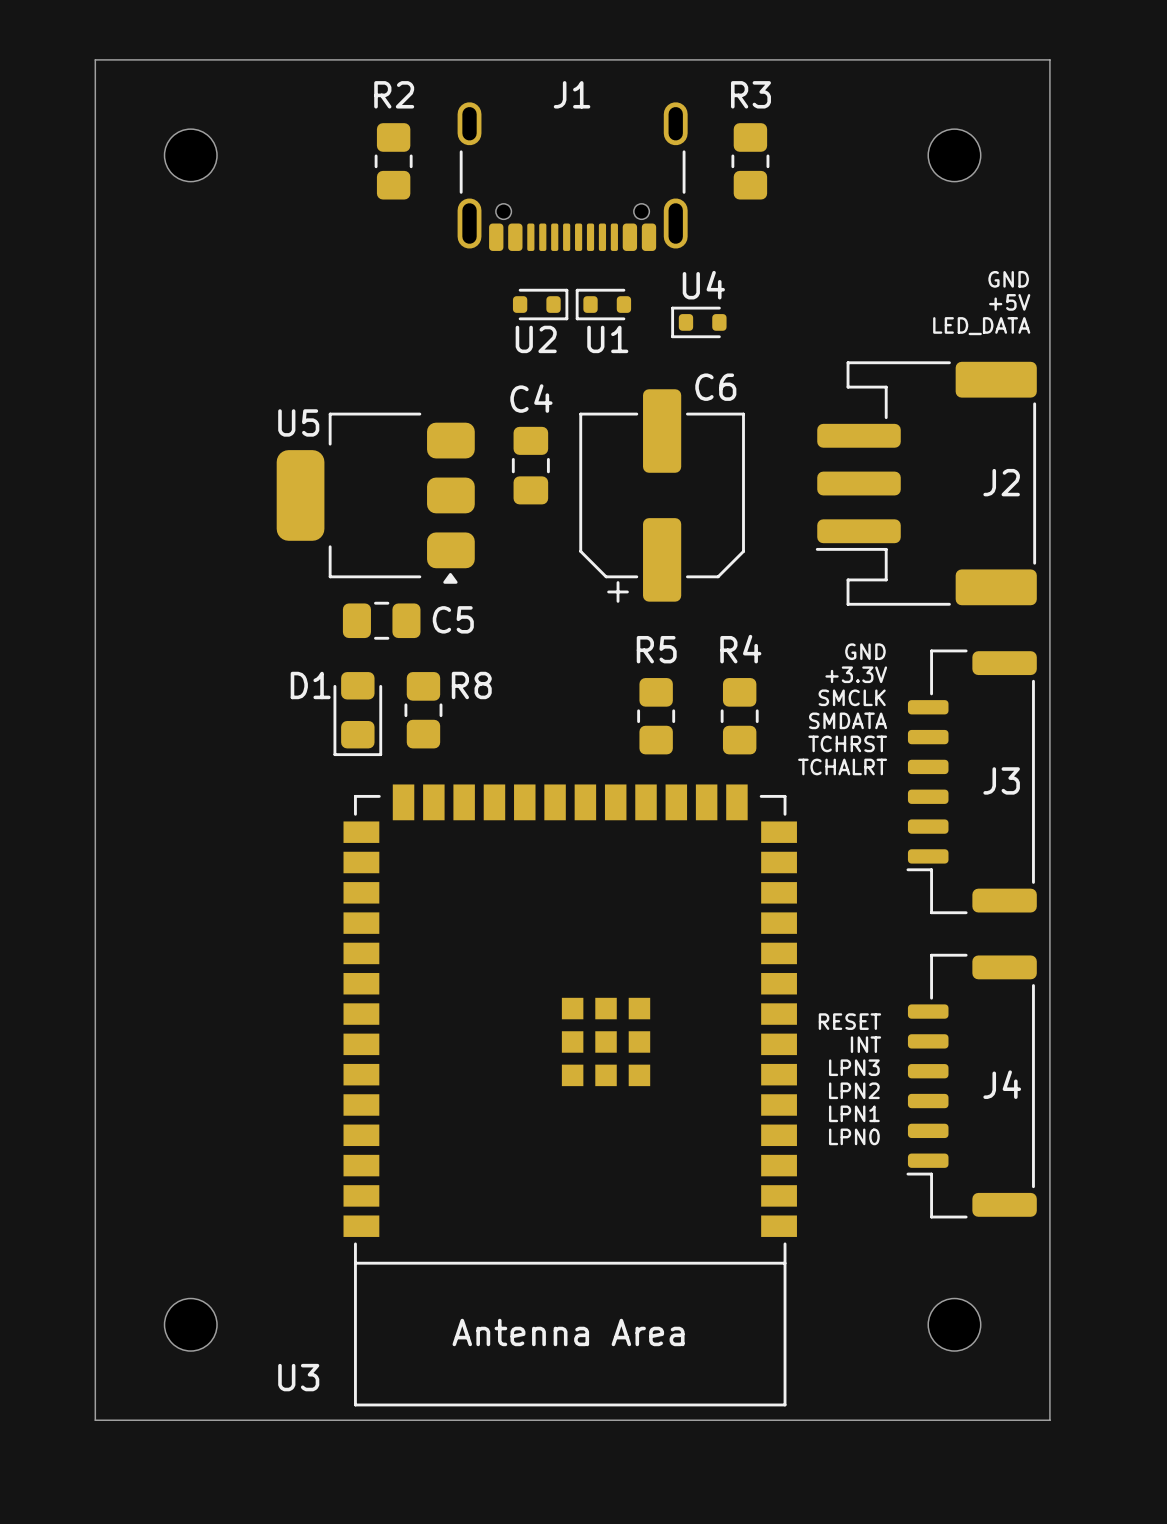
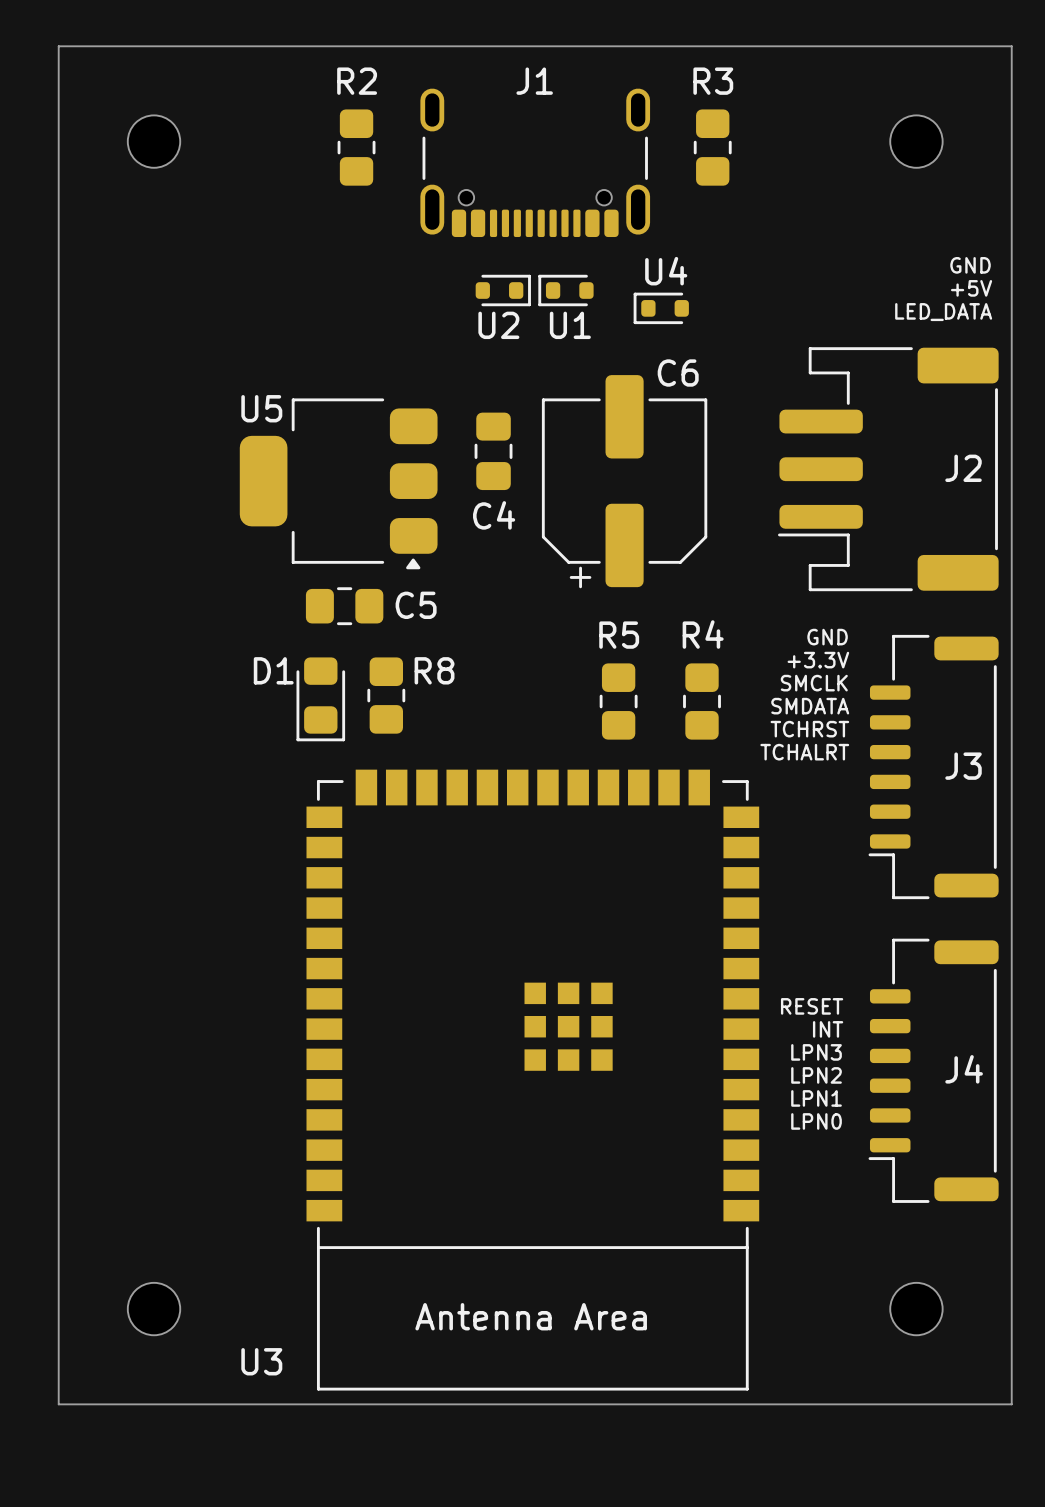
C4 name position: C4 (531, 398) -> C4 (494, 515)

